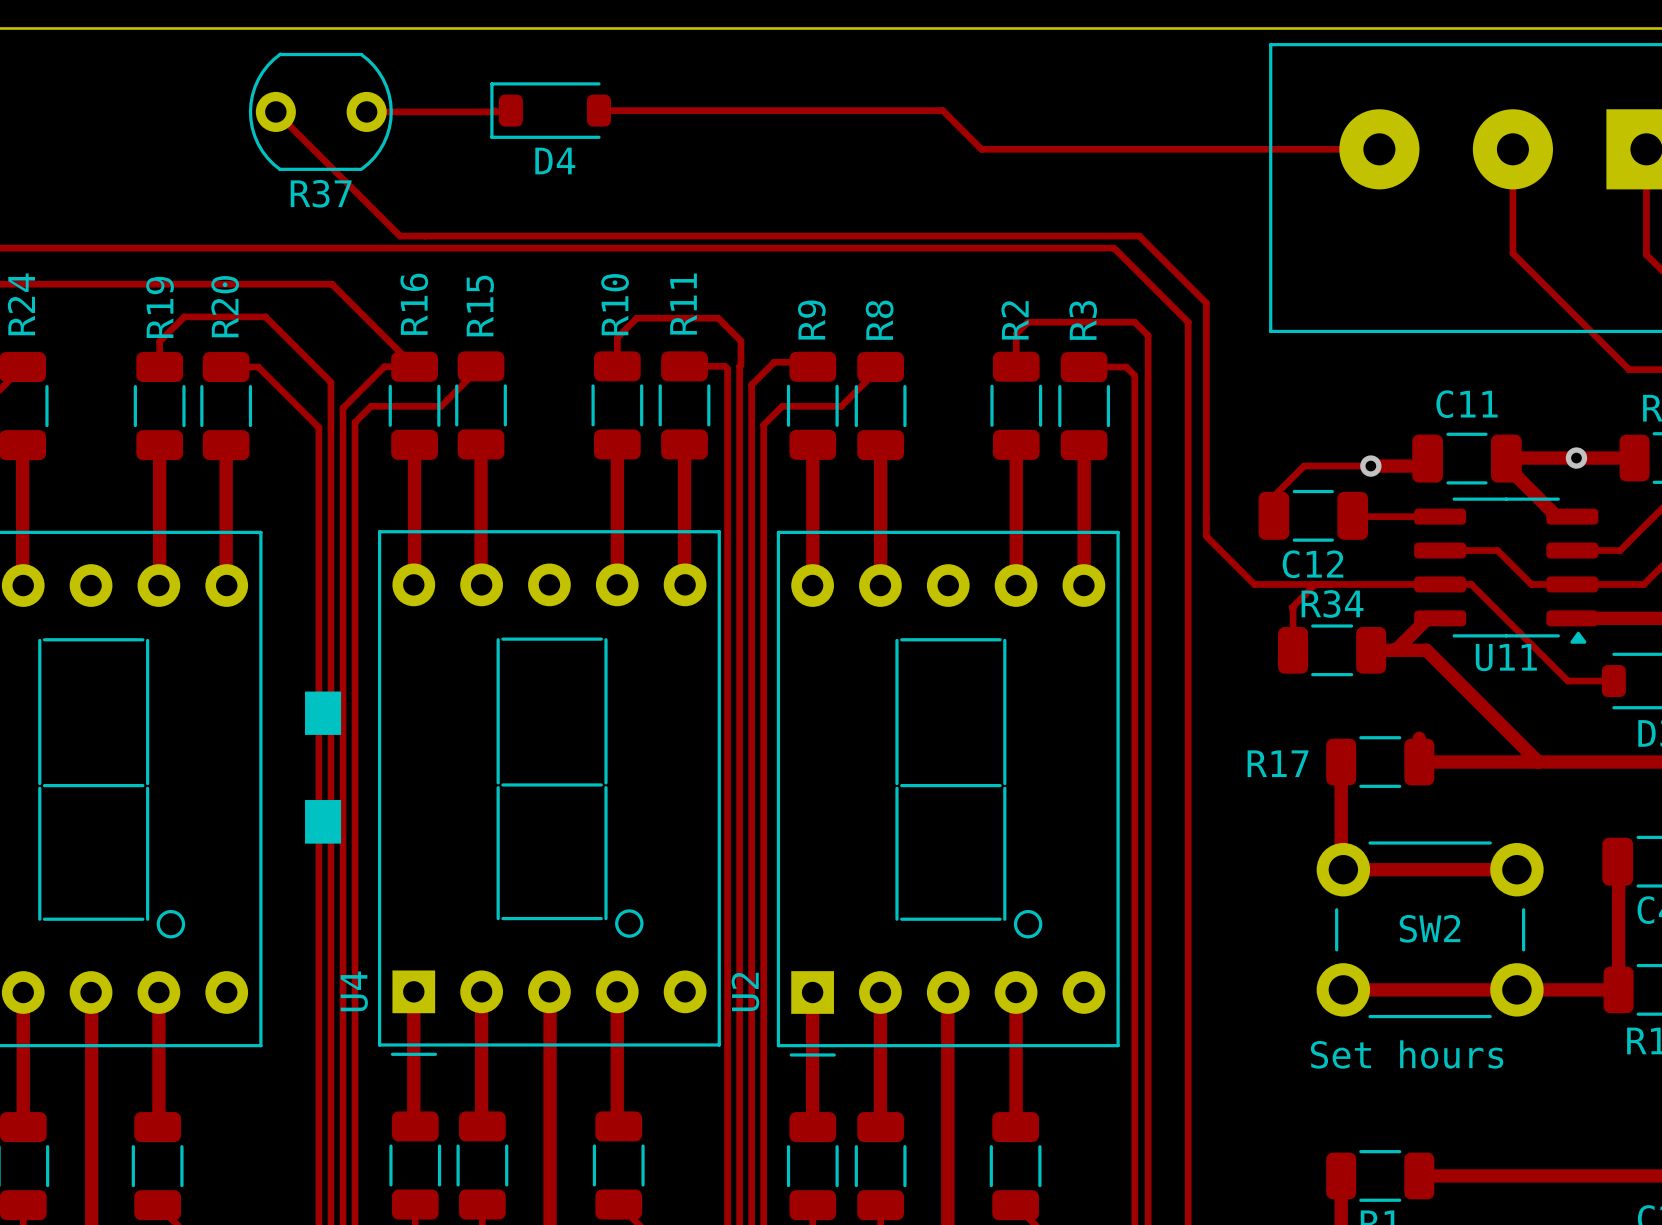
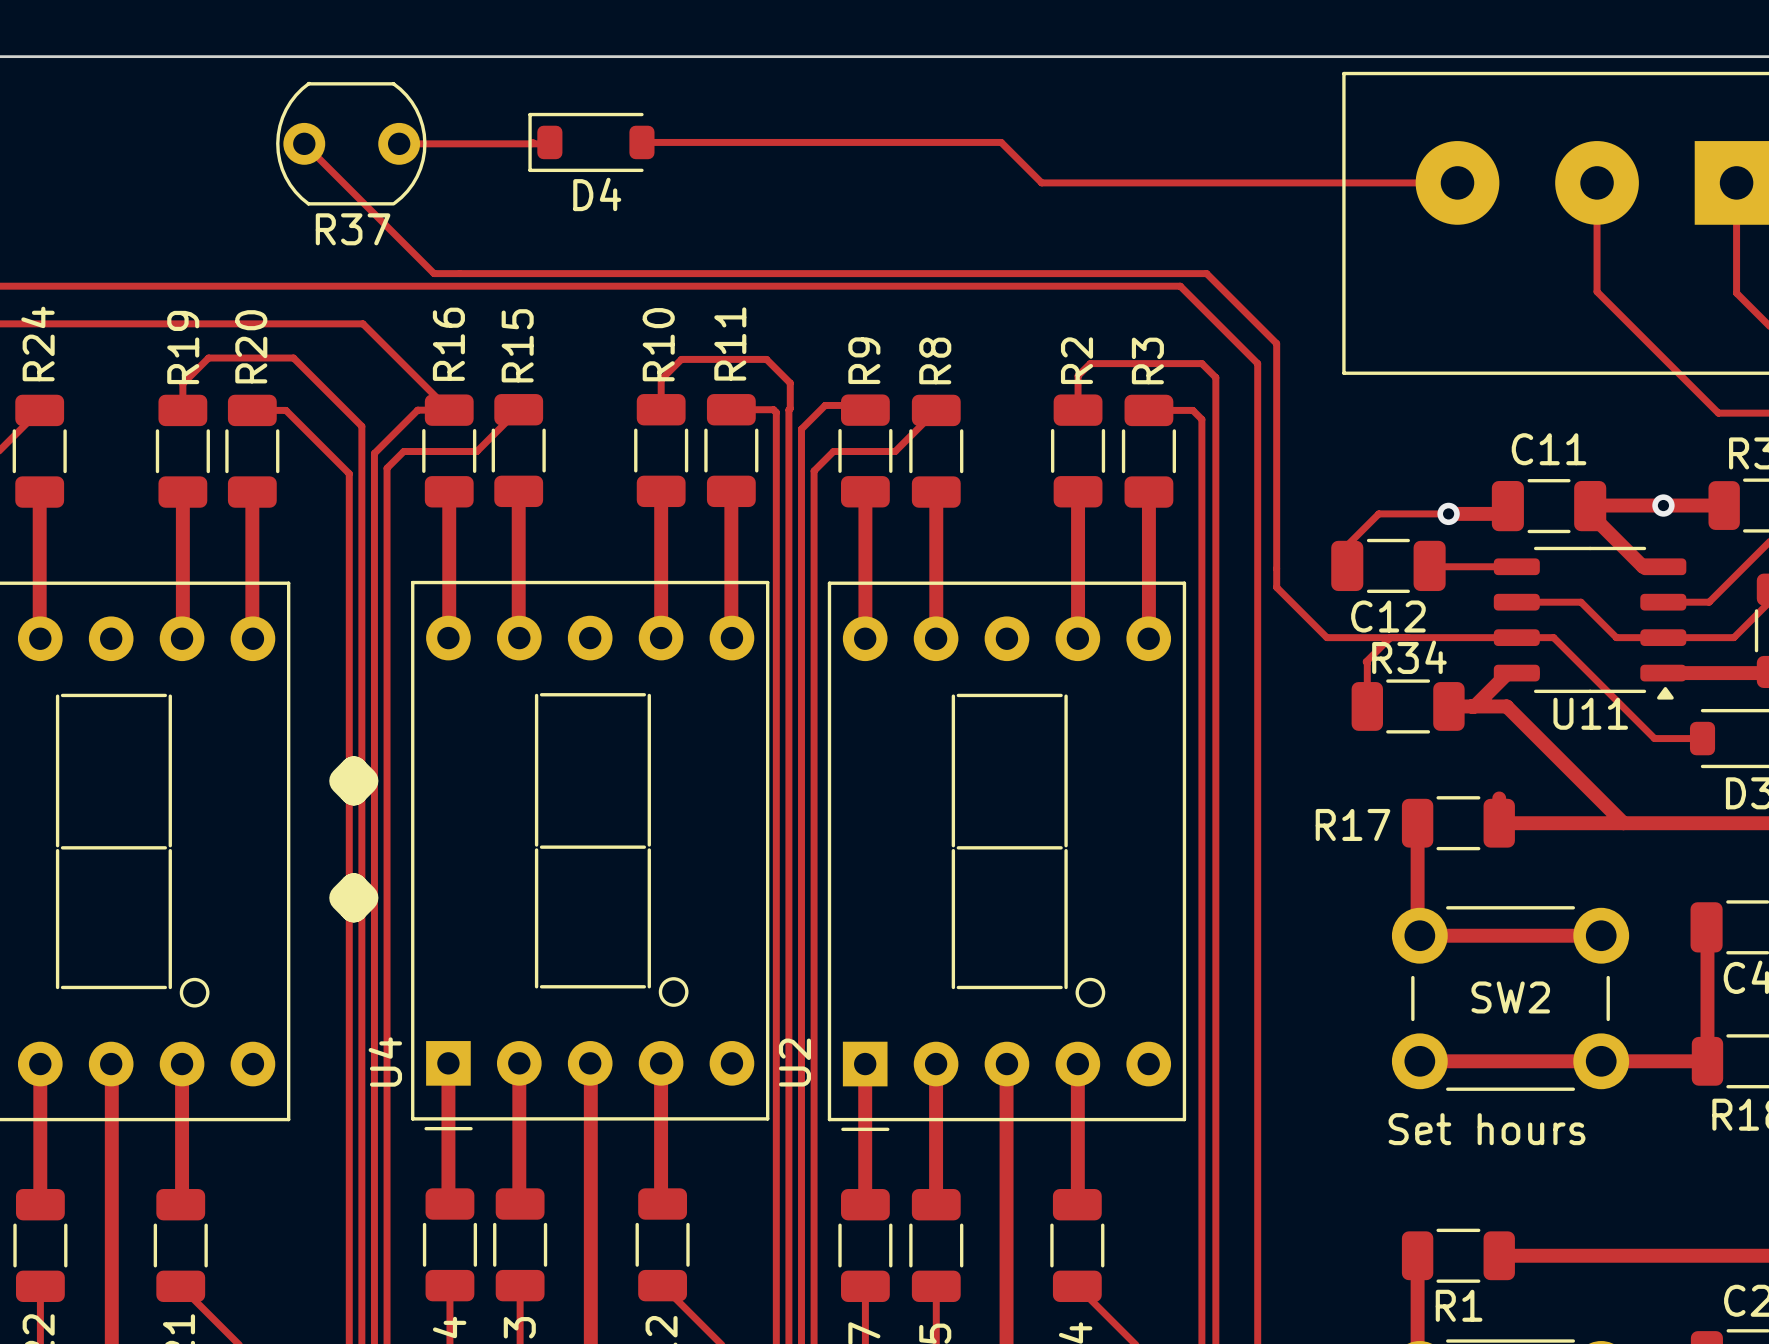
U11 footprint: [1414, 497, 1599, 644] -> [1493, 546, 1687, 700]

